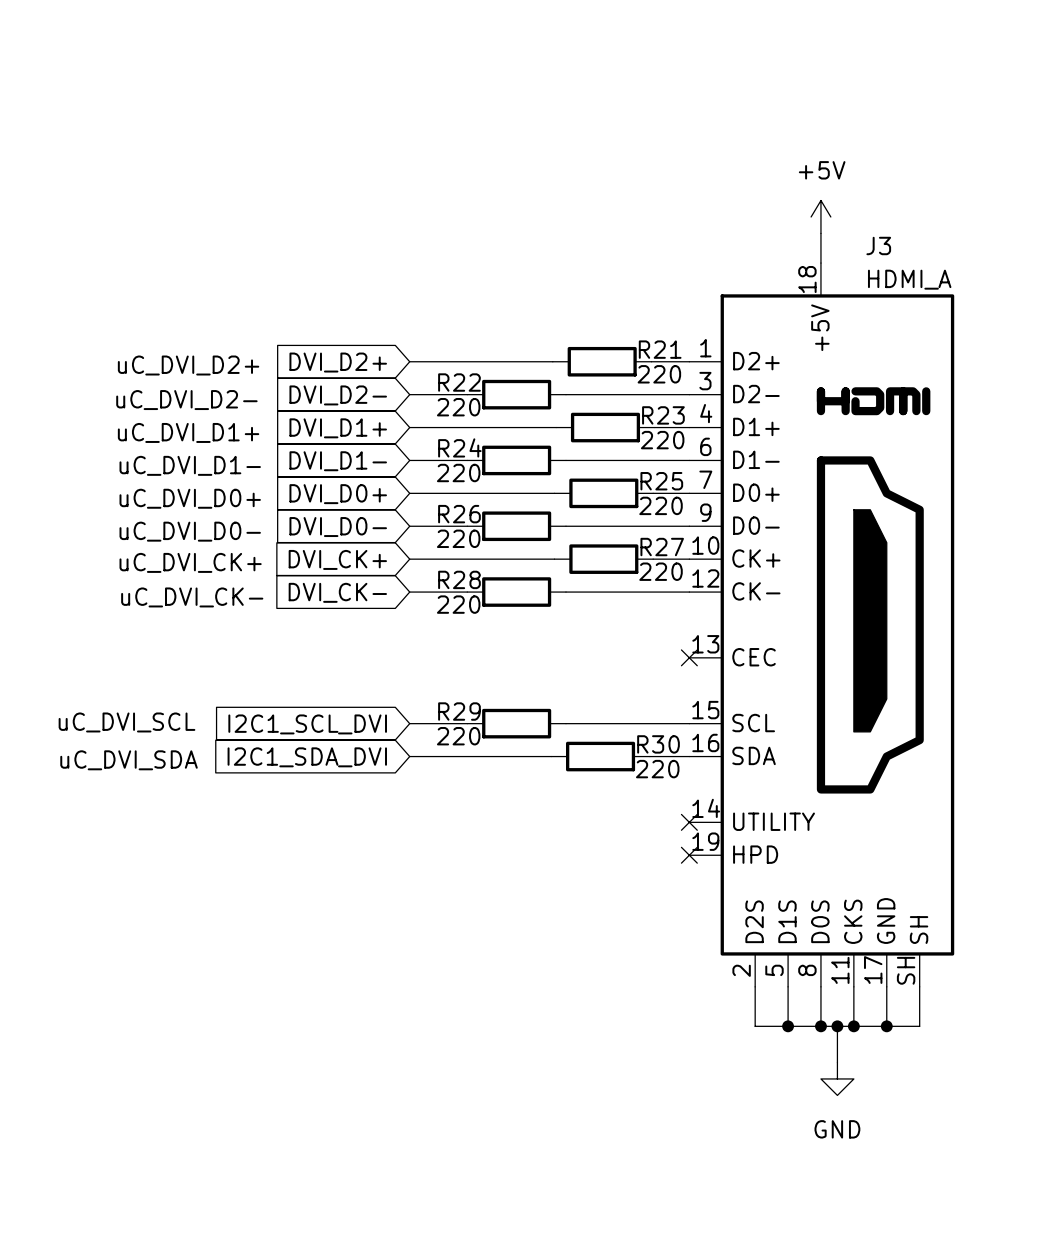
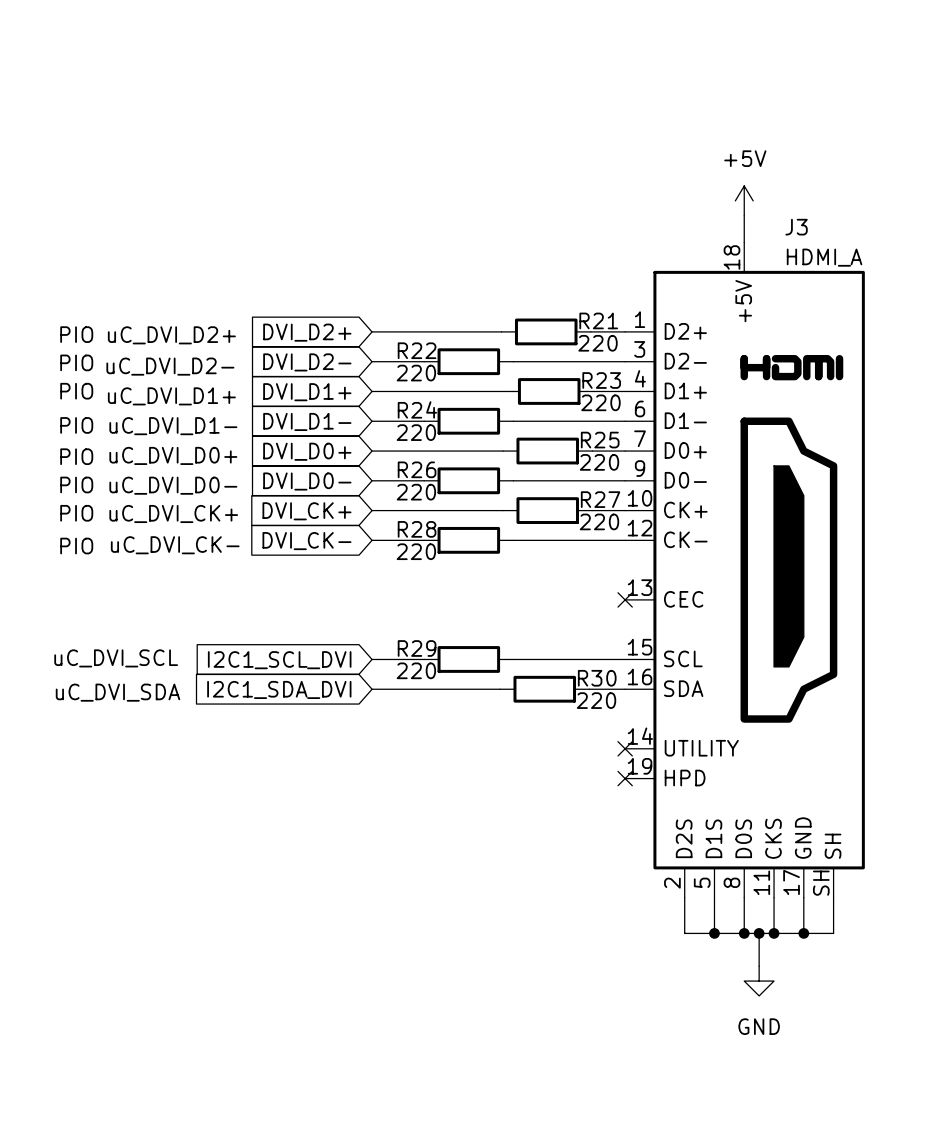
text: none -> PIO (76, 334)
text: none -> PIO (76, 362)
text: none -> PIO (76, 391)
text: none -> PIO (76, 425)
text: none -> PIO (76, 456)
text: none -> PIO (76, 484)
text: none -> PIO (76, 513)
text: none -> PIO (76, 546)

